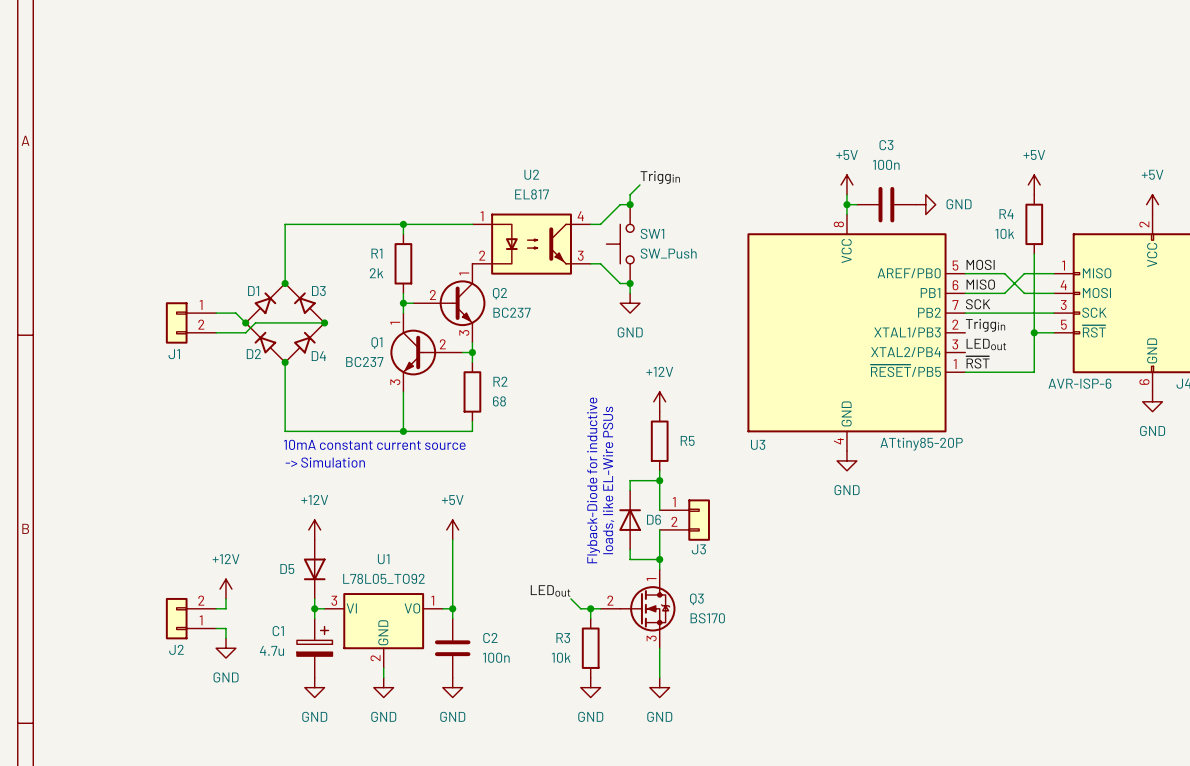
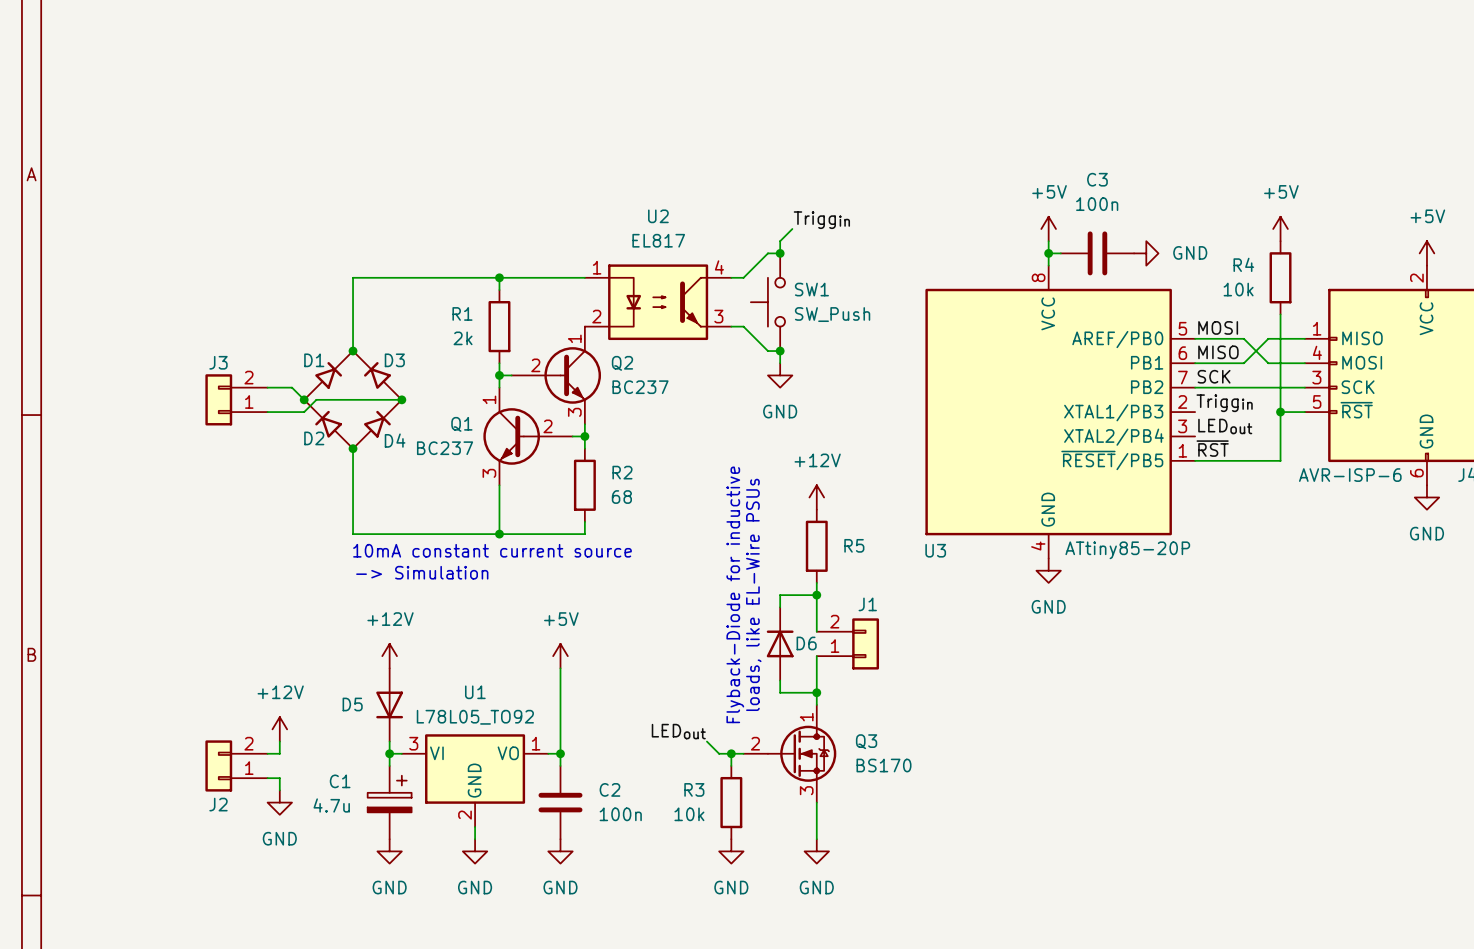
J1 rotation: 0° (176, 322) -> 180° (865, 643)
J1 position: (190, 322) -> (847, 643)
J3 position: (684, 520) -> (236, 399)
J3 rotation: 0° (699, 520) -> 180° (218, 399)

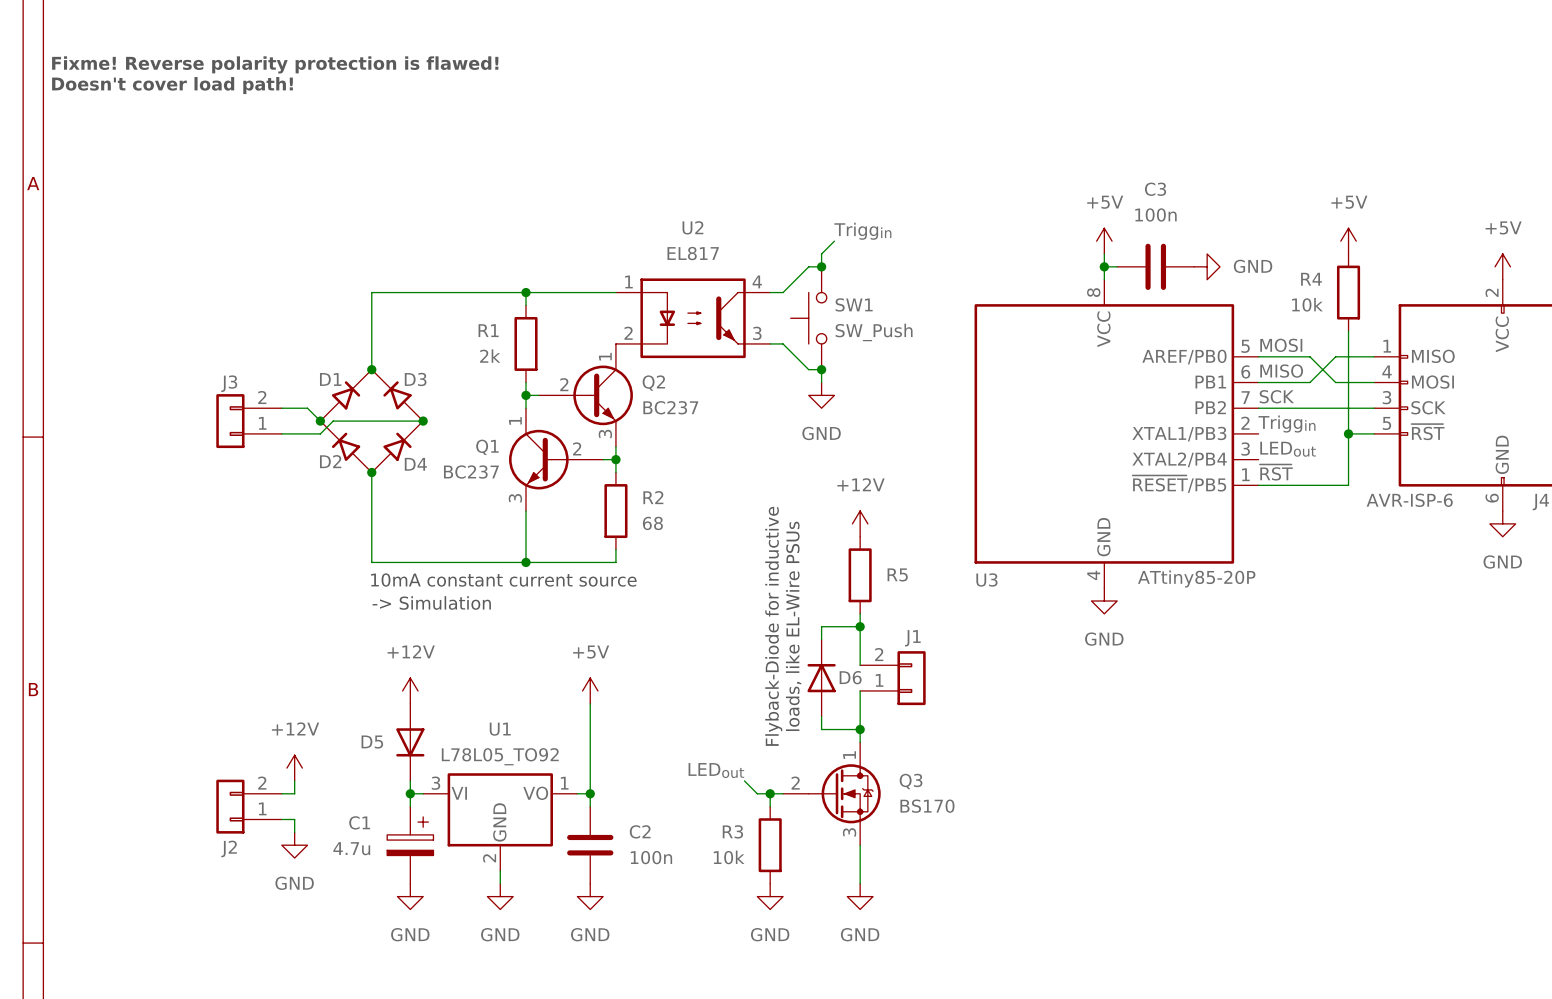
text: none -> Fixme! Reverse polarity protection is flawed! (275, 64)
text: none -> Doesn't cover load path! (172, 85)

